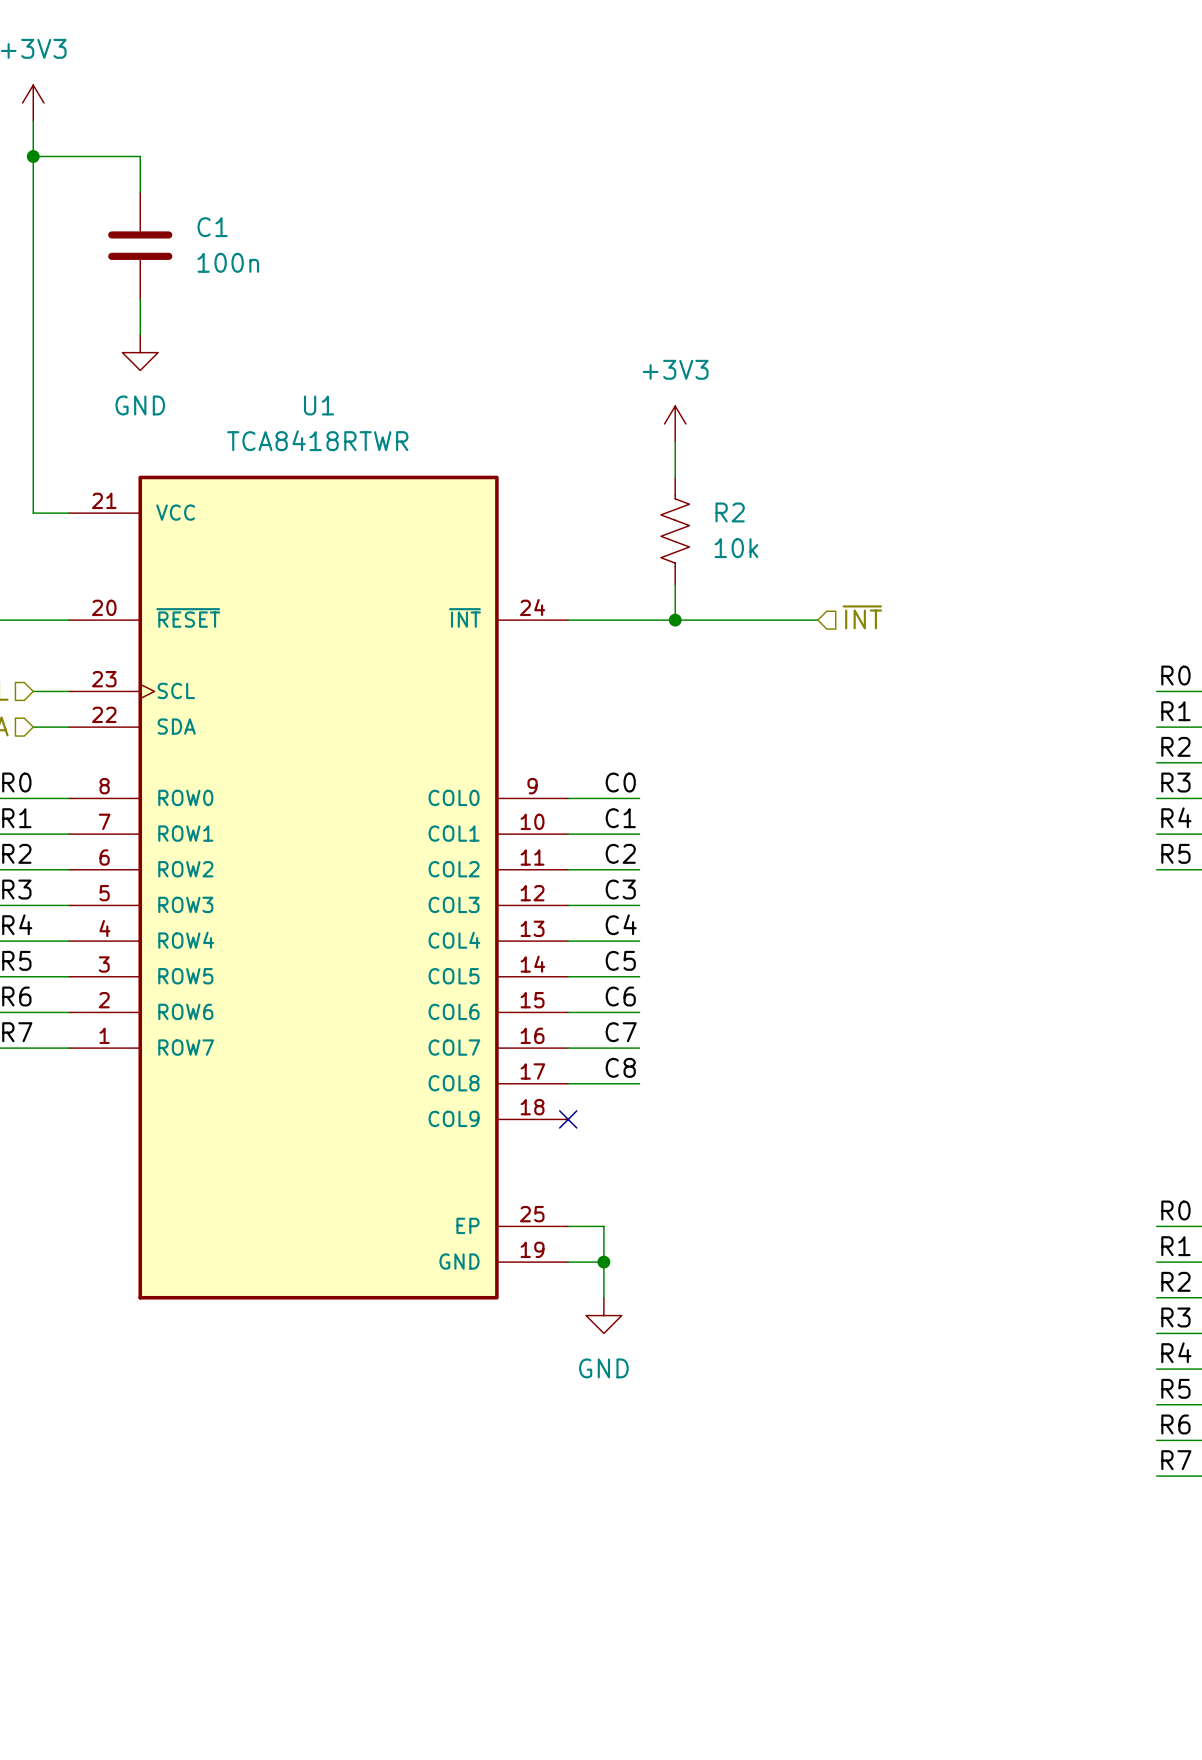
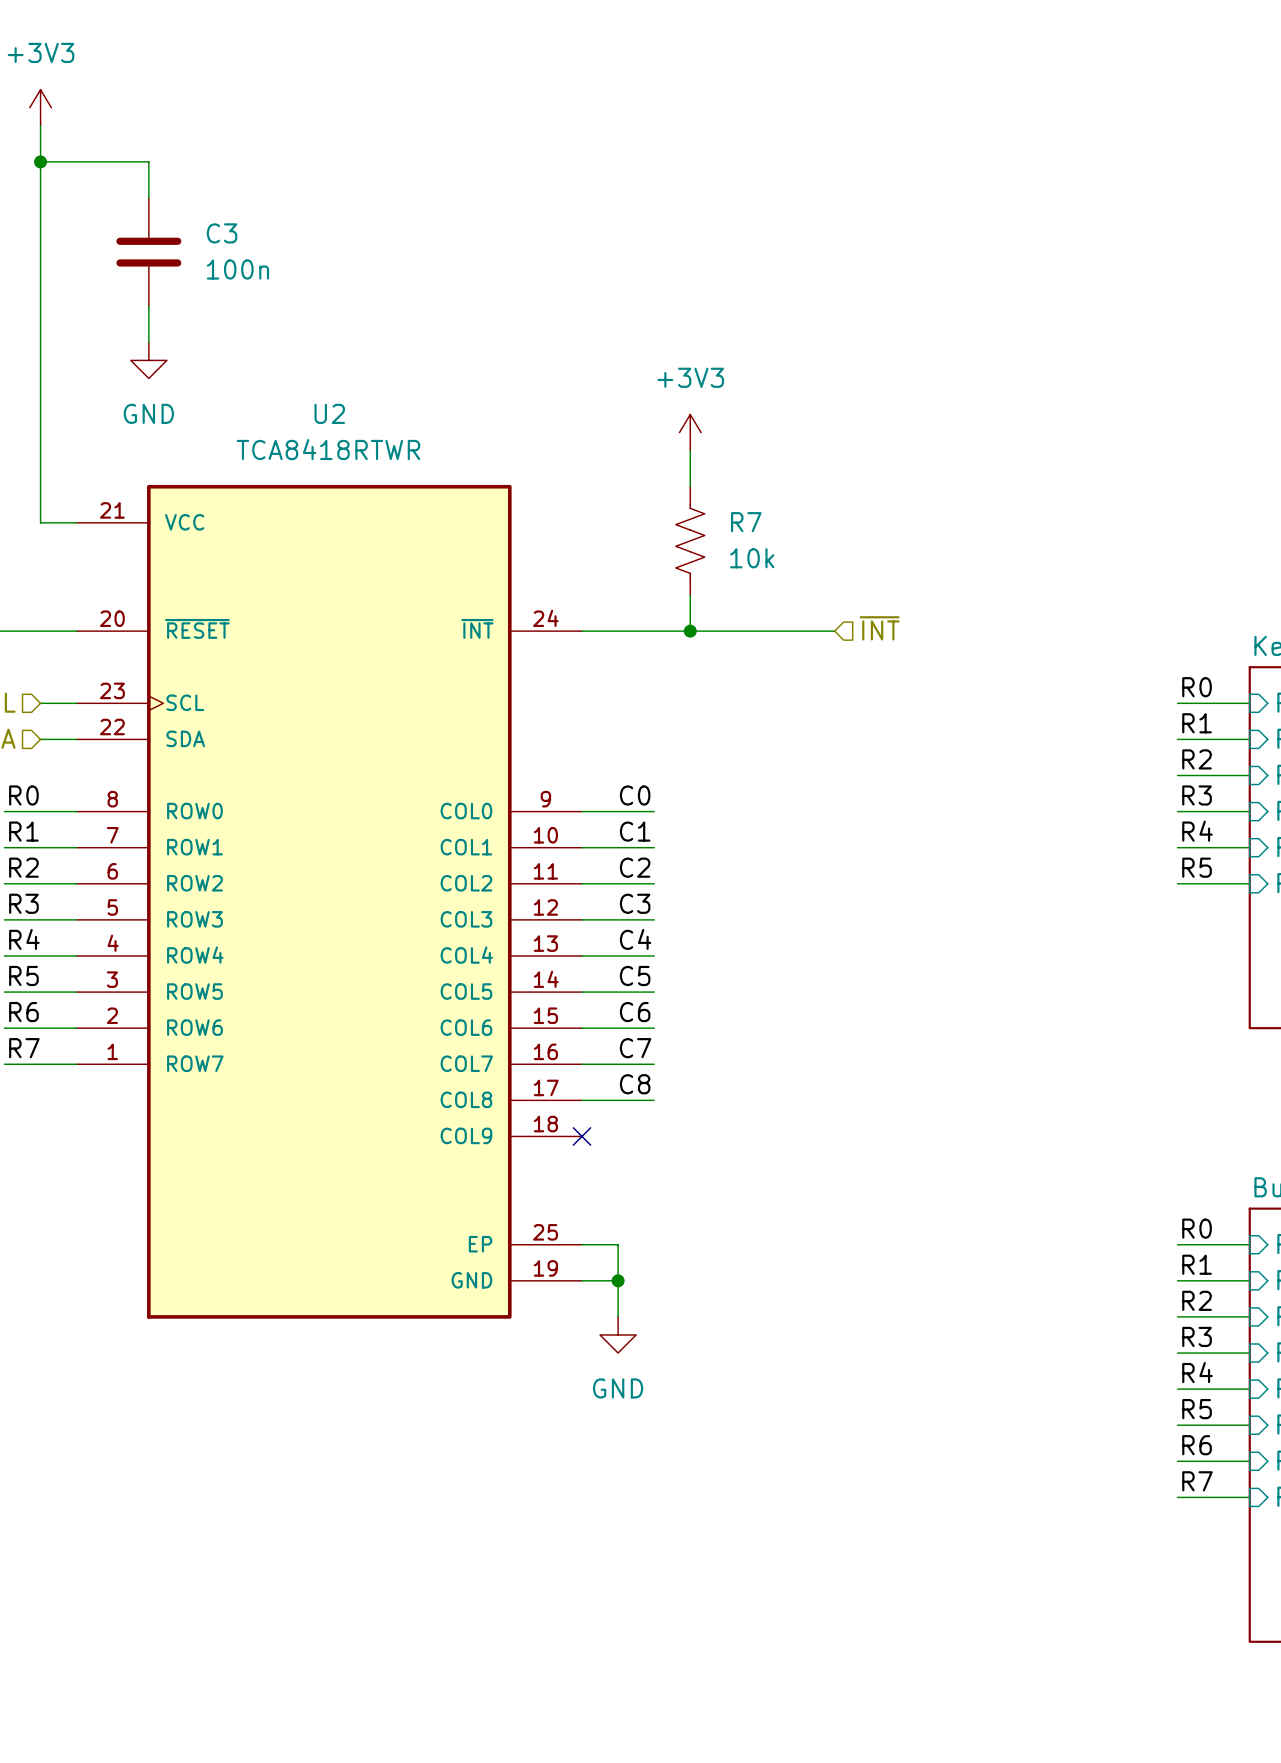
C1 name: C1 (212, 227) -> C3 (222, 233)
U1 name: U1 (319, 405) -> U2 (329, 413)
R2 name: R2 (730, 512) -> R7 (746, 522)

